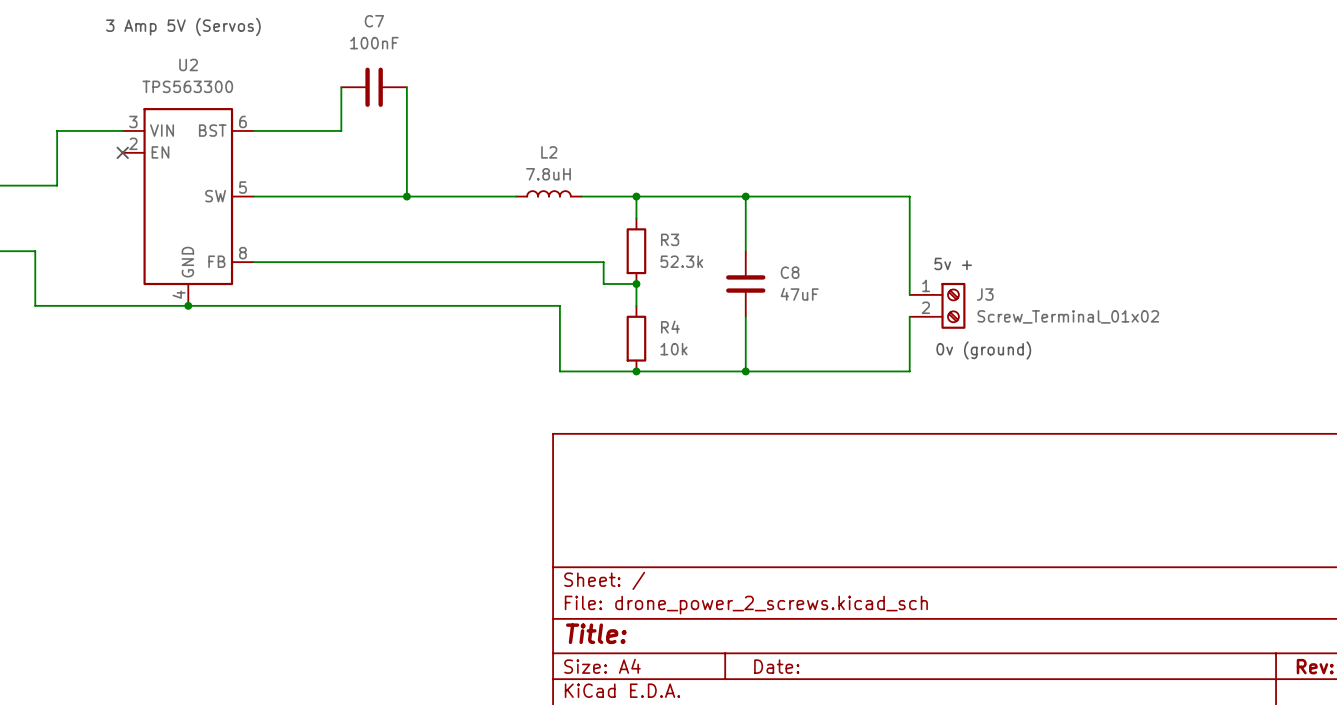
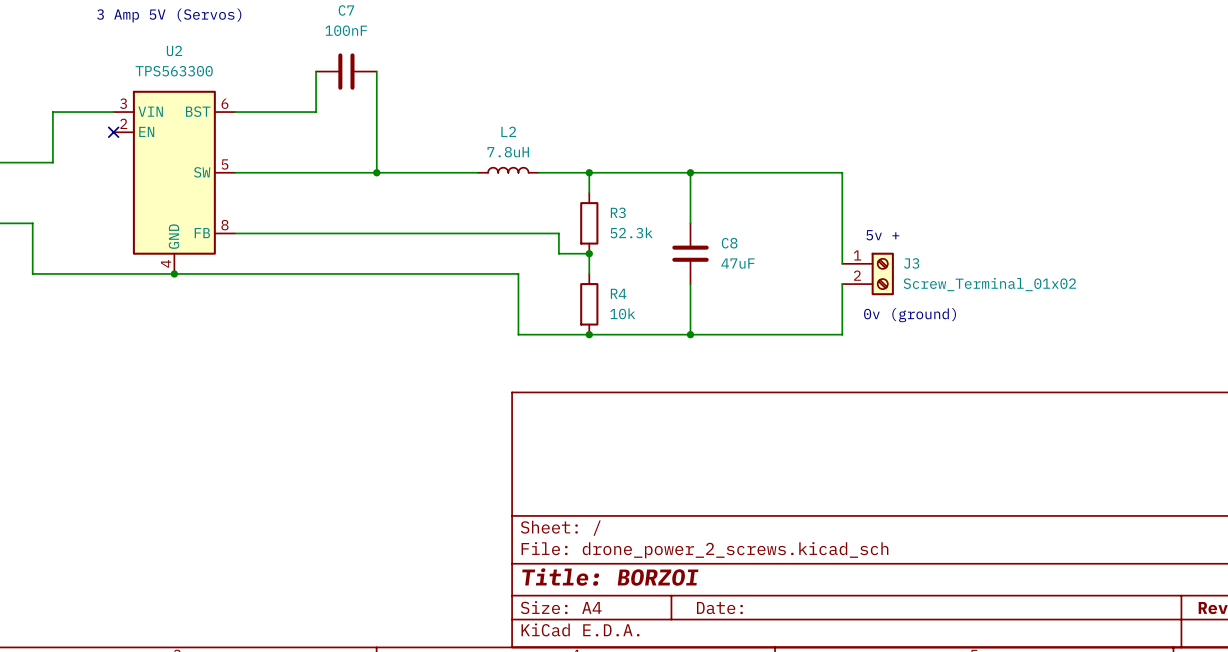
title block: Title: (596, 633) -> Title: BORZOI (610, 577)

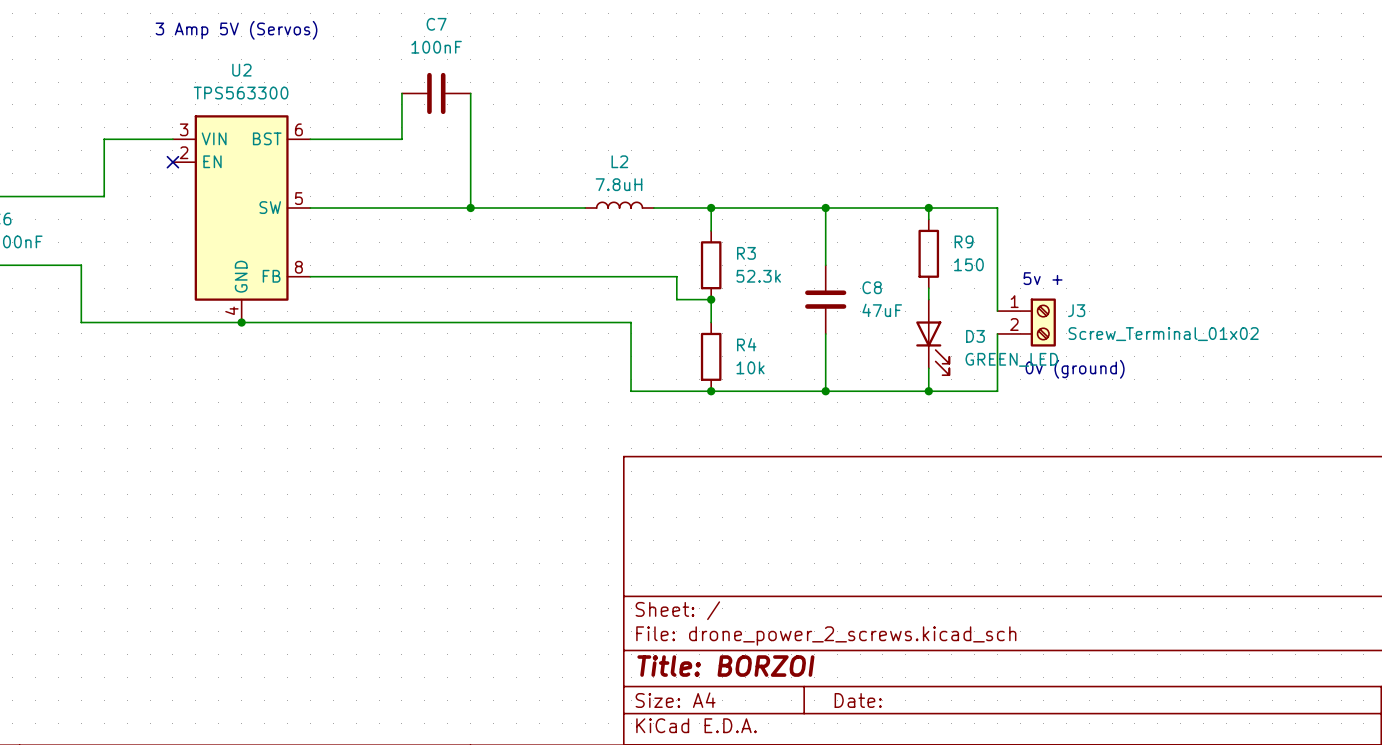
wire: none -> (928, 208) (928, 219)
junction: none -> (928, 208)
R9: none -> 150 (928, 253)
wire: none -> (928, 288) (928, 299)
D3: none -> GREEN_LED (932, 337)
wire: none -> (928, 368) (928, 391)
junction: none -> (928, 391)

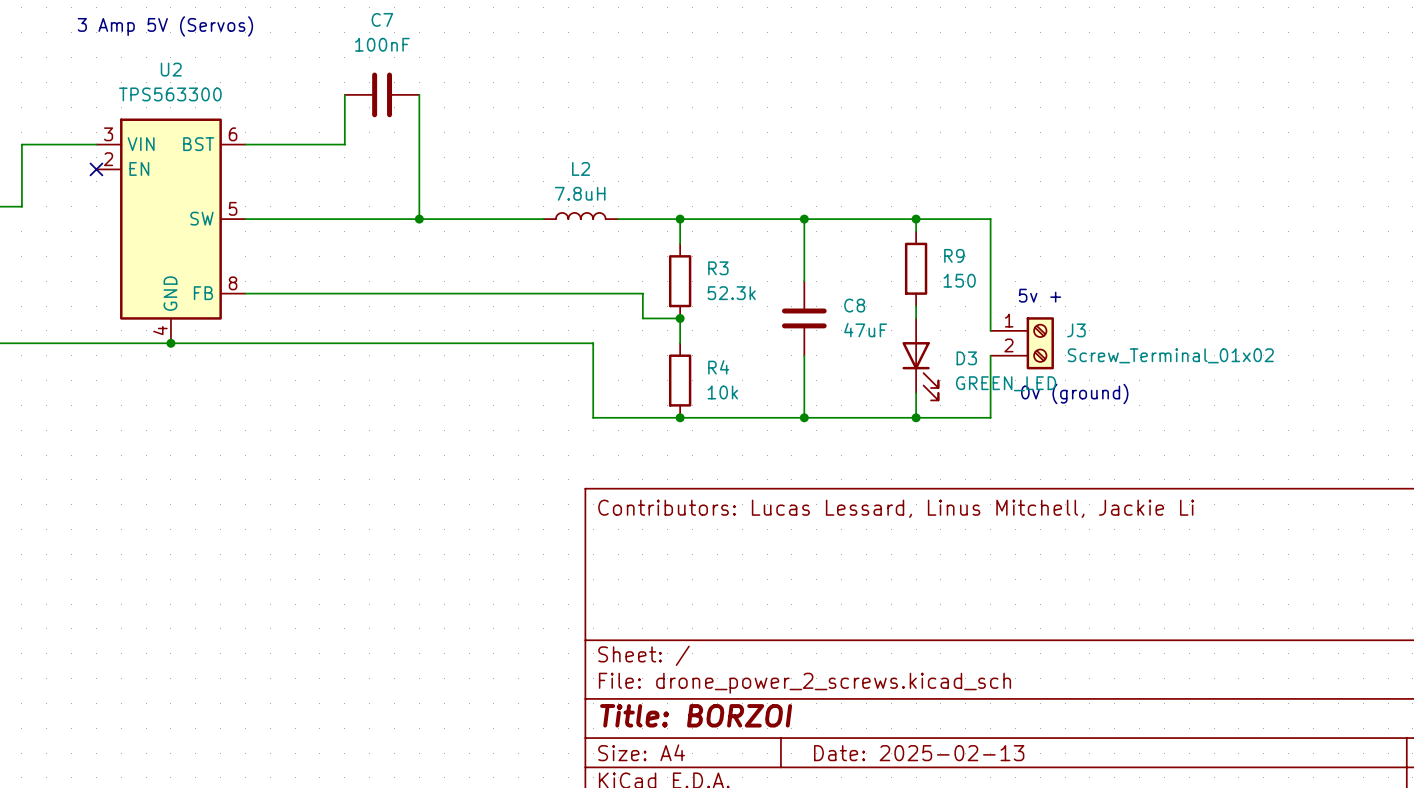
title block: none -> Contributors: Lucas Lessard, Linus Mitchell, Jackie Li (896, 508)
title block: Date: (858, 700) -> Date: 2025-02-13 (919, 753)

